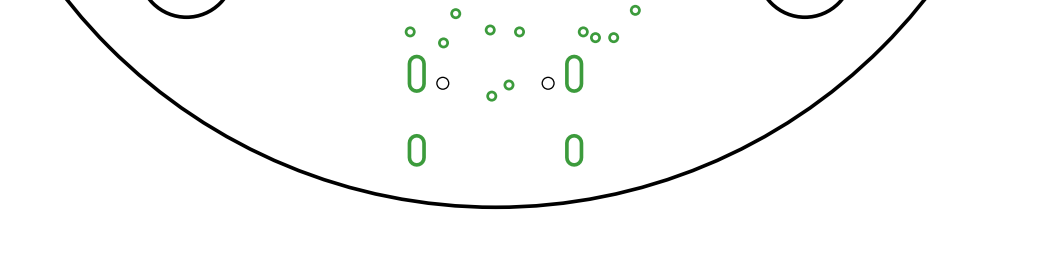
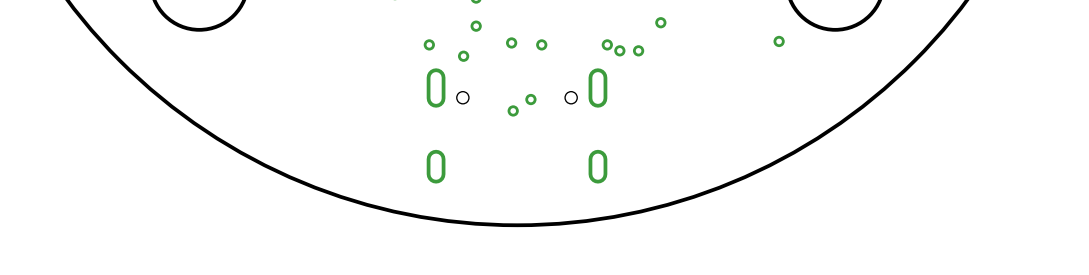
via: none -> (779, 41)

